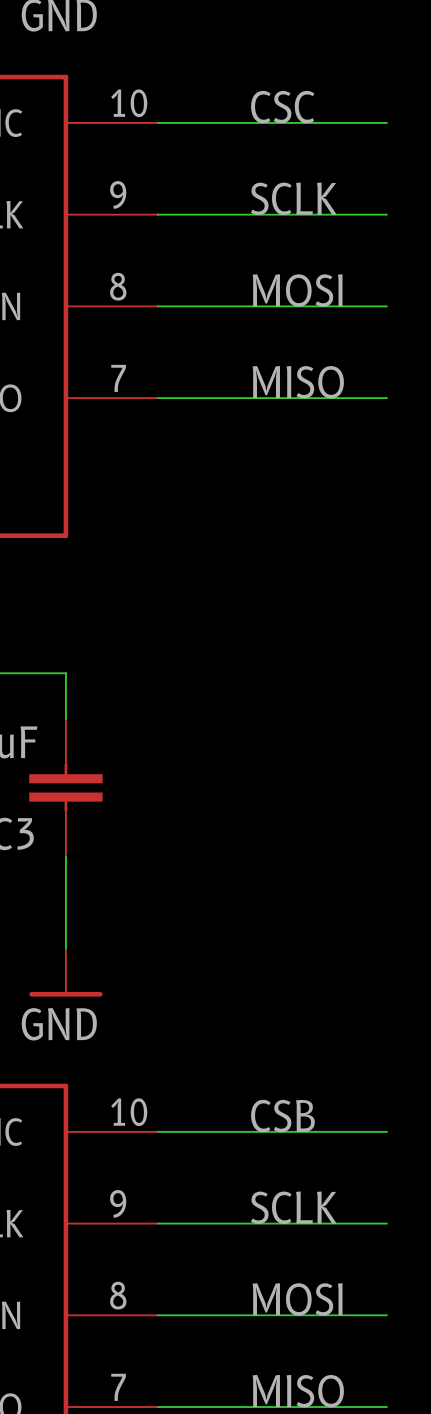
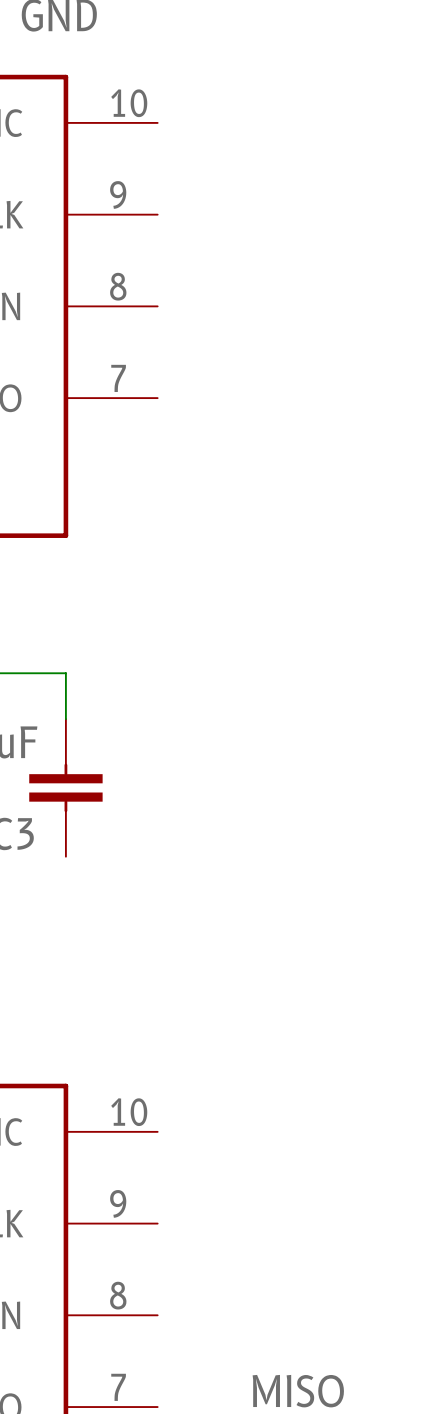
label: CSC (282, 107) -> none
wire: (157, 122) (386, 122) -> none
label: SCLK (293, 198) -> none
wire: (157, 214) (386, 214) -> none
label: MOSI (297, 290) -> none
wire: (157, 306) (386, 306) -> none
label: MISO (298, 382) -> none
wire: (157, 398) (386, 398) -> none
wire: (65, 856) (65, 948) -> none
power symbol: GND (65, 972) -> none
label: CSB (282, 1116) -> none
wire: (157, 1131) (386, 1131) -> none
label: SCLK (293, 1207) -> none
wire: (157, 1223) (386, 1223) -> none
label: MOSI (297, 1299) -> none
wire: (157, 1315) (386, 1315) -> none
wire: (157, 1407) (386, 1407) -> none

